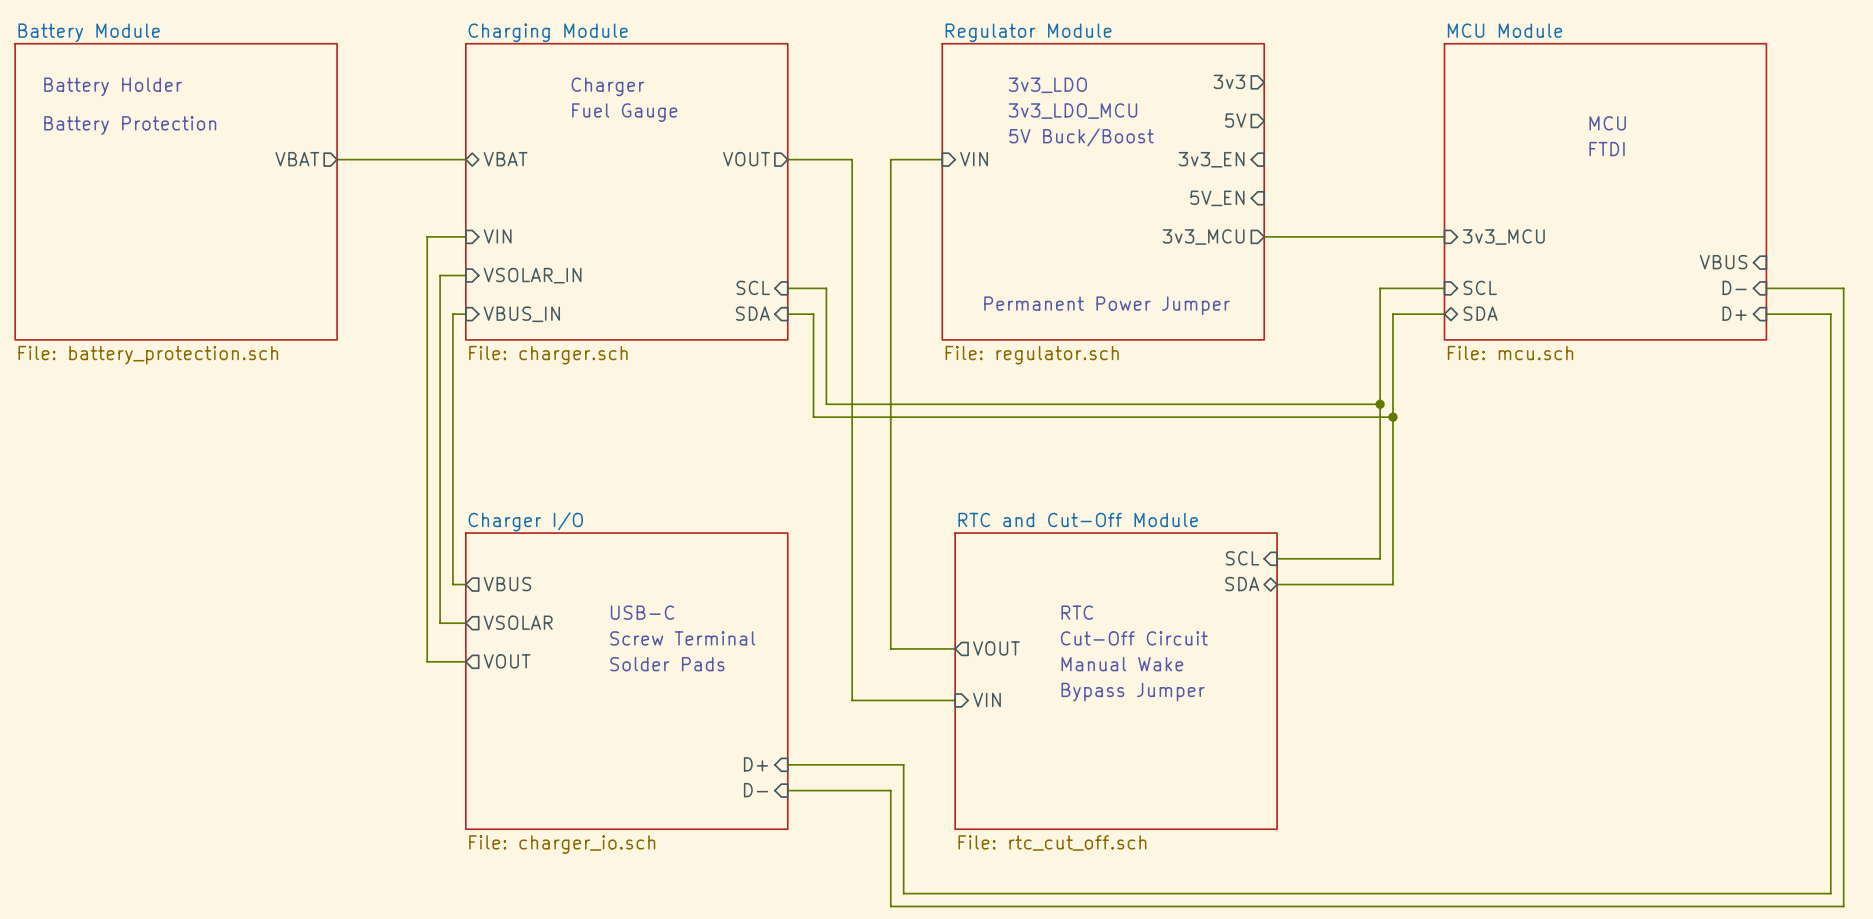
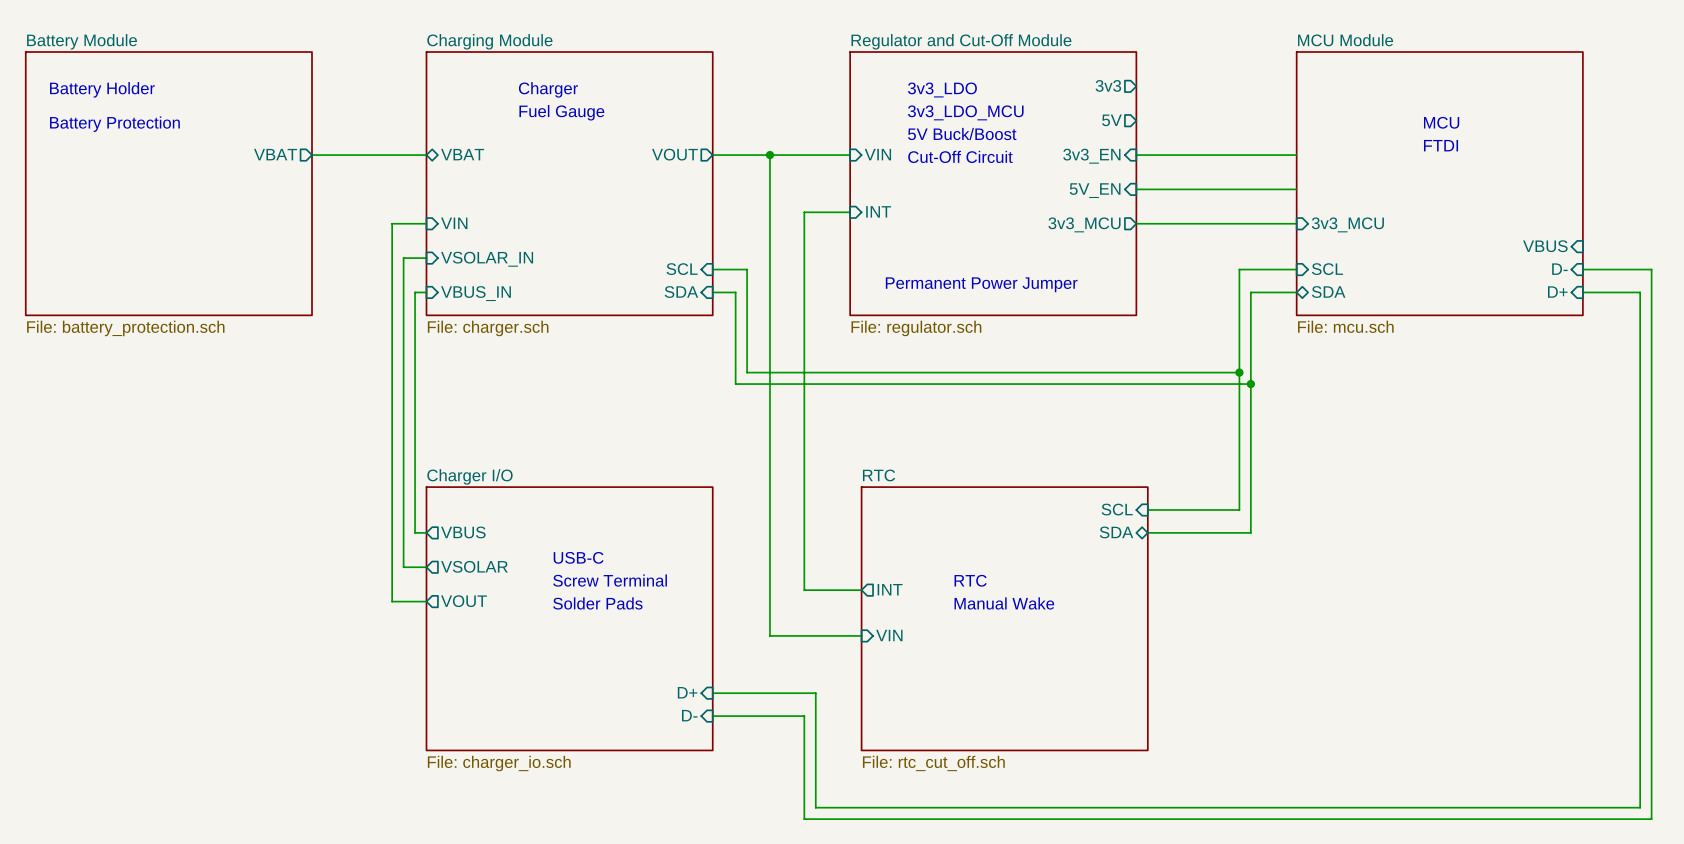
sheet Regulator Module name: Regulator Module (1028, 32) -> Regulator and Cut-Off Module (961, 41)
junction: none -> (769, 155)
wire: (890, 159) (890, 224) -> (804, 155) (769, 155)
wire: none -> (1136, 155) (1296, 155)
text: none -> Cut-Off Circuit (960, 156)
wire: none -> (1136, 189) (1296, 189)
sheet pin: none -> INT (878, 211)
wire: none -> (804, 212) (850, 212)
sheet RTC and Cut-Off Module name: RTC and Cut-Off Module (1078, 519) -> RTC (879, 475)
text: RTC (1077, 612) -> none
text: Cut-Off Circuit (1134, 638) -> RTC (970, 580)
sheet pin: VOUT (996, 648) -> INT (890, 589)
text: Bypass Jumper (1133, 692) -> none

